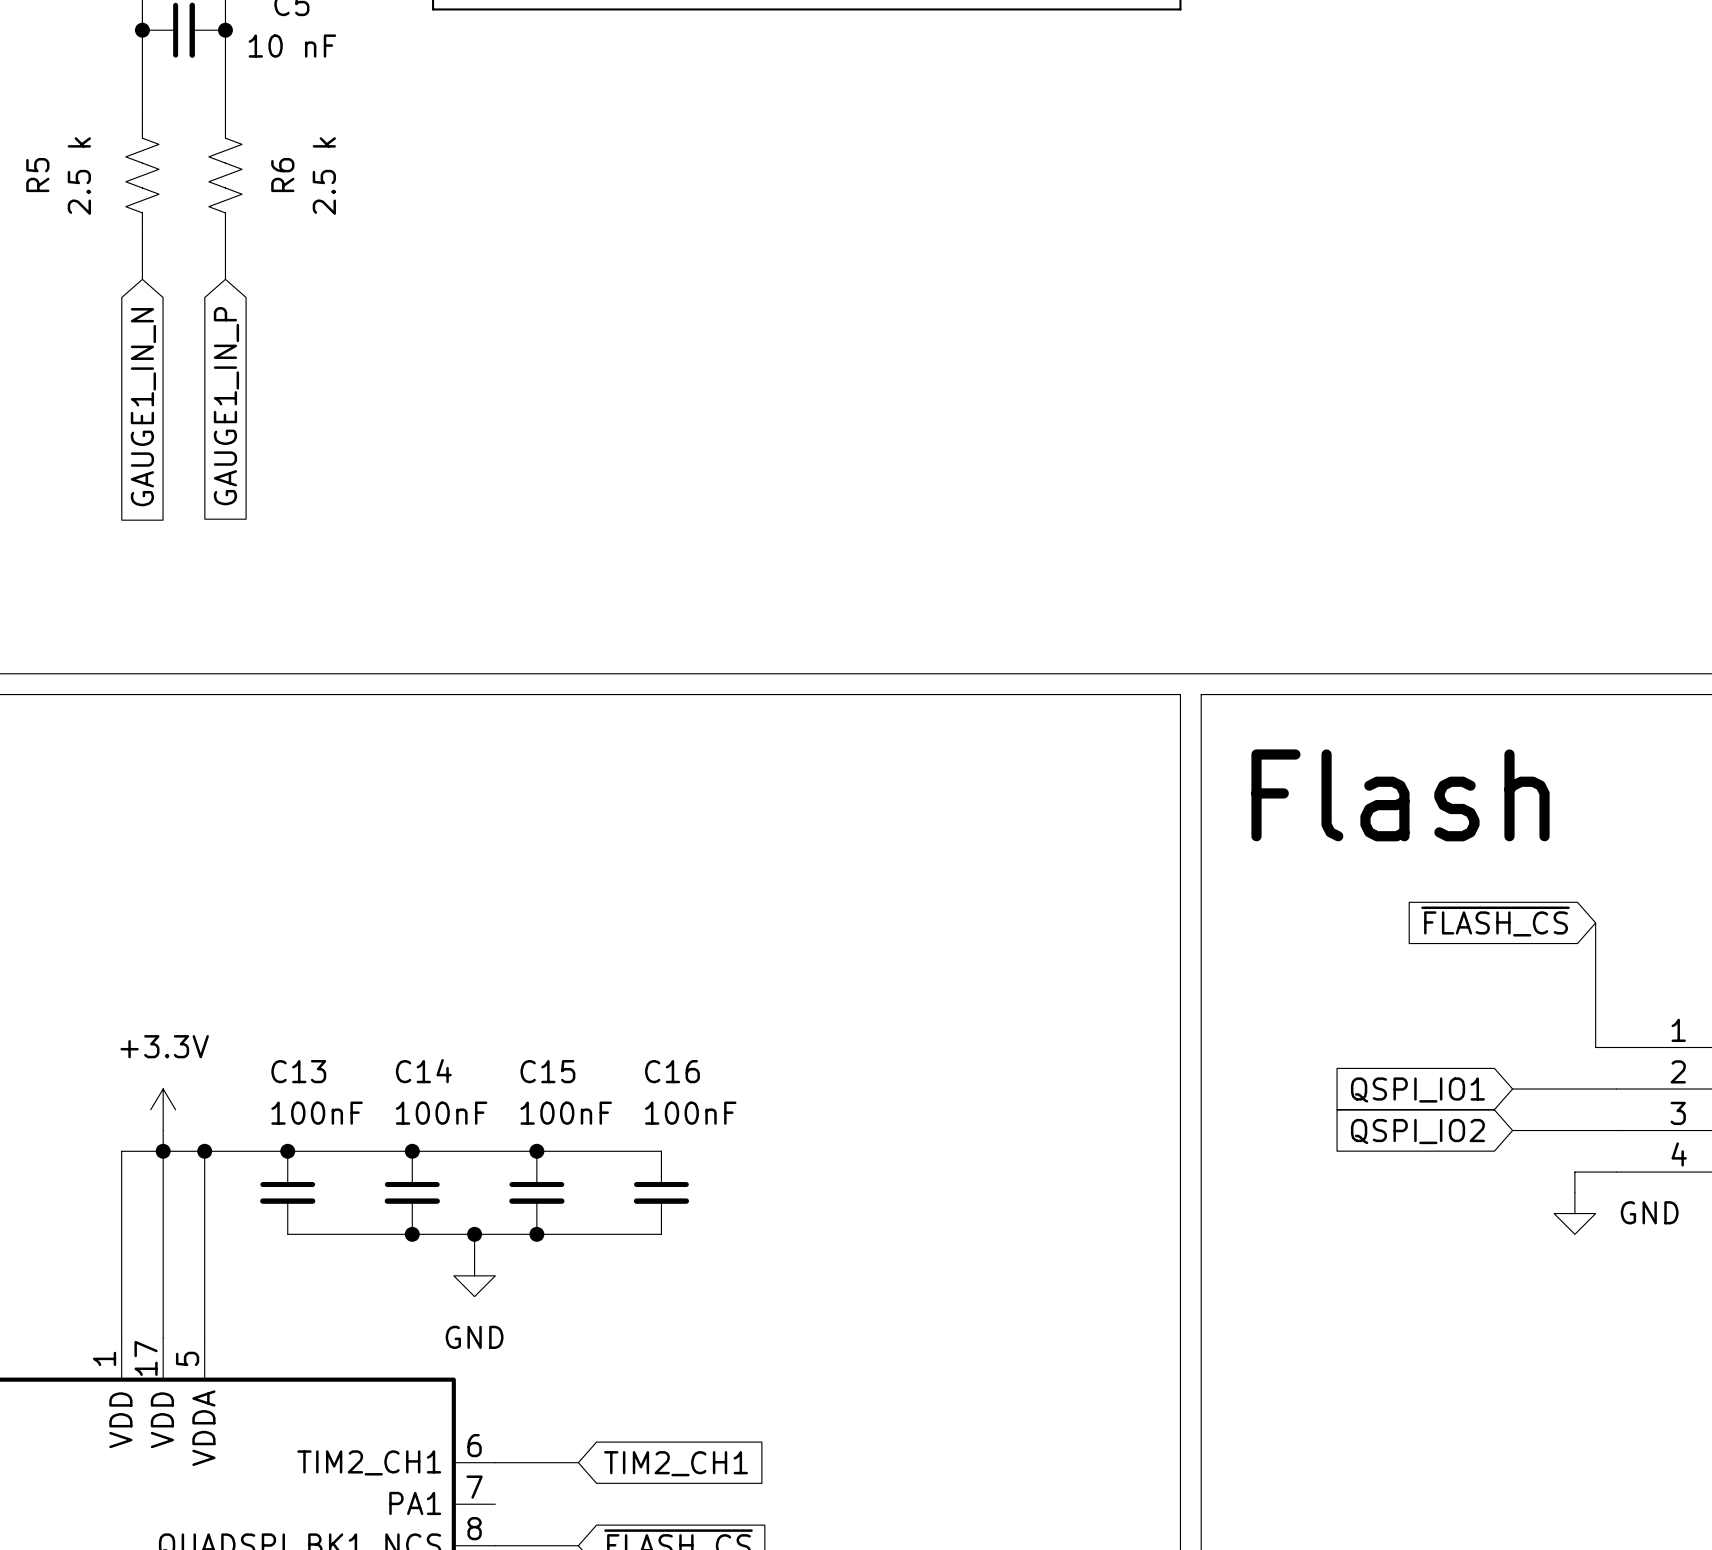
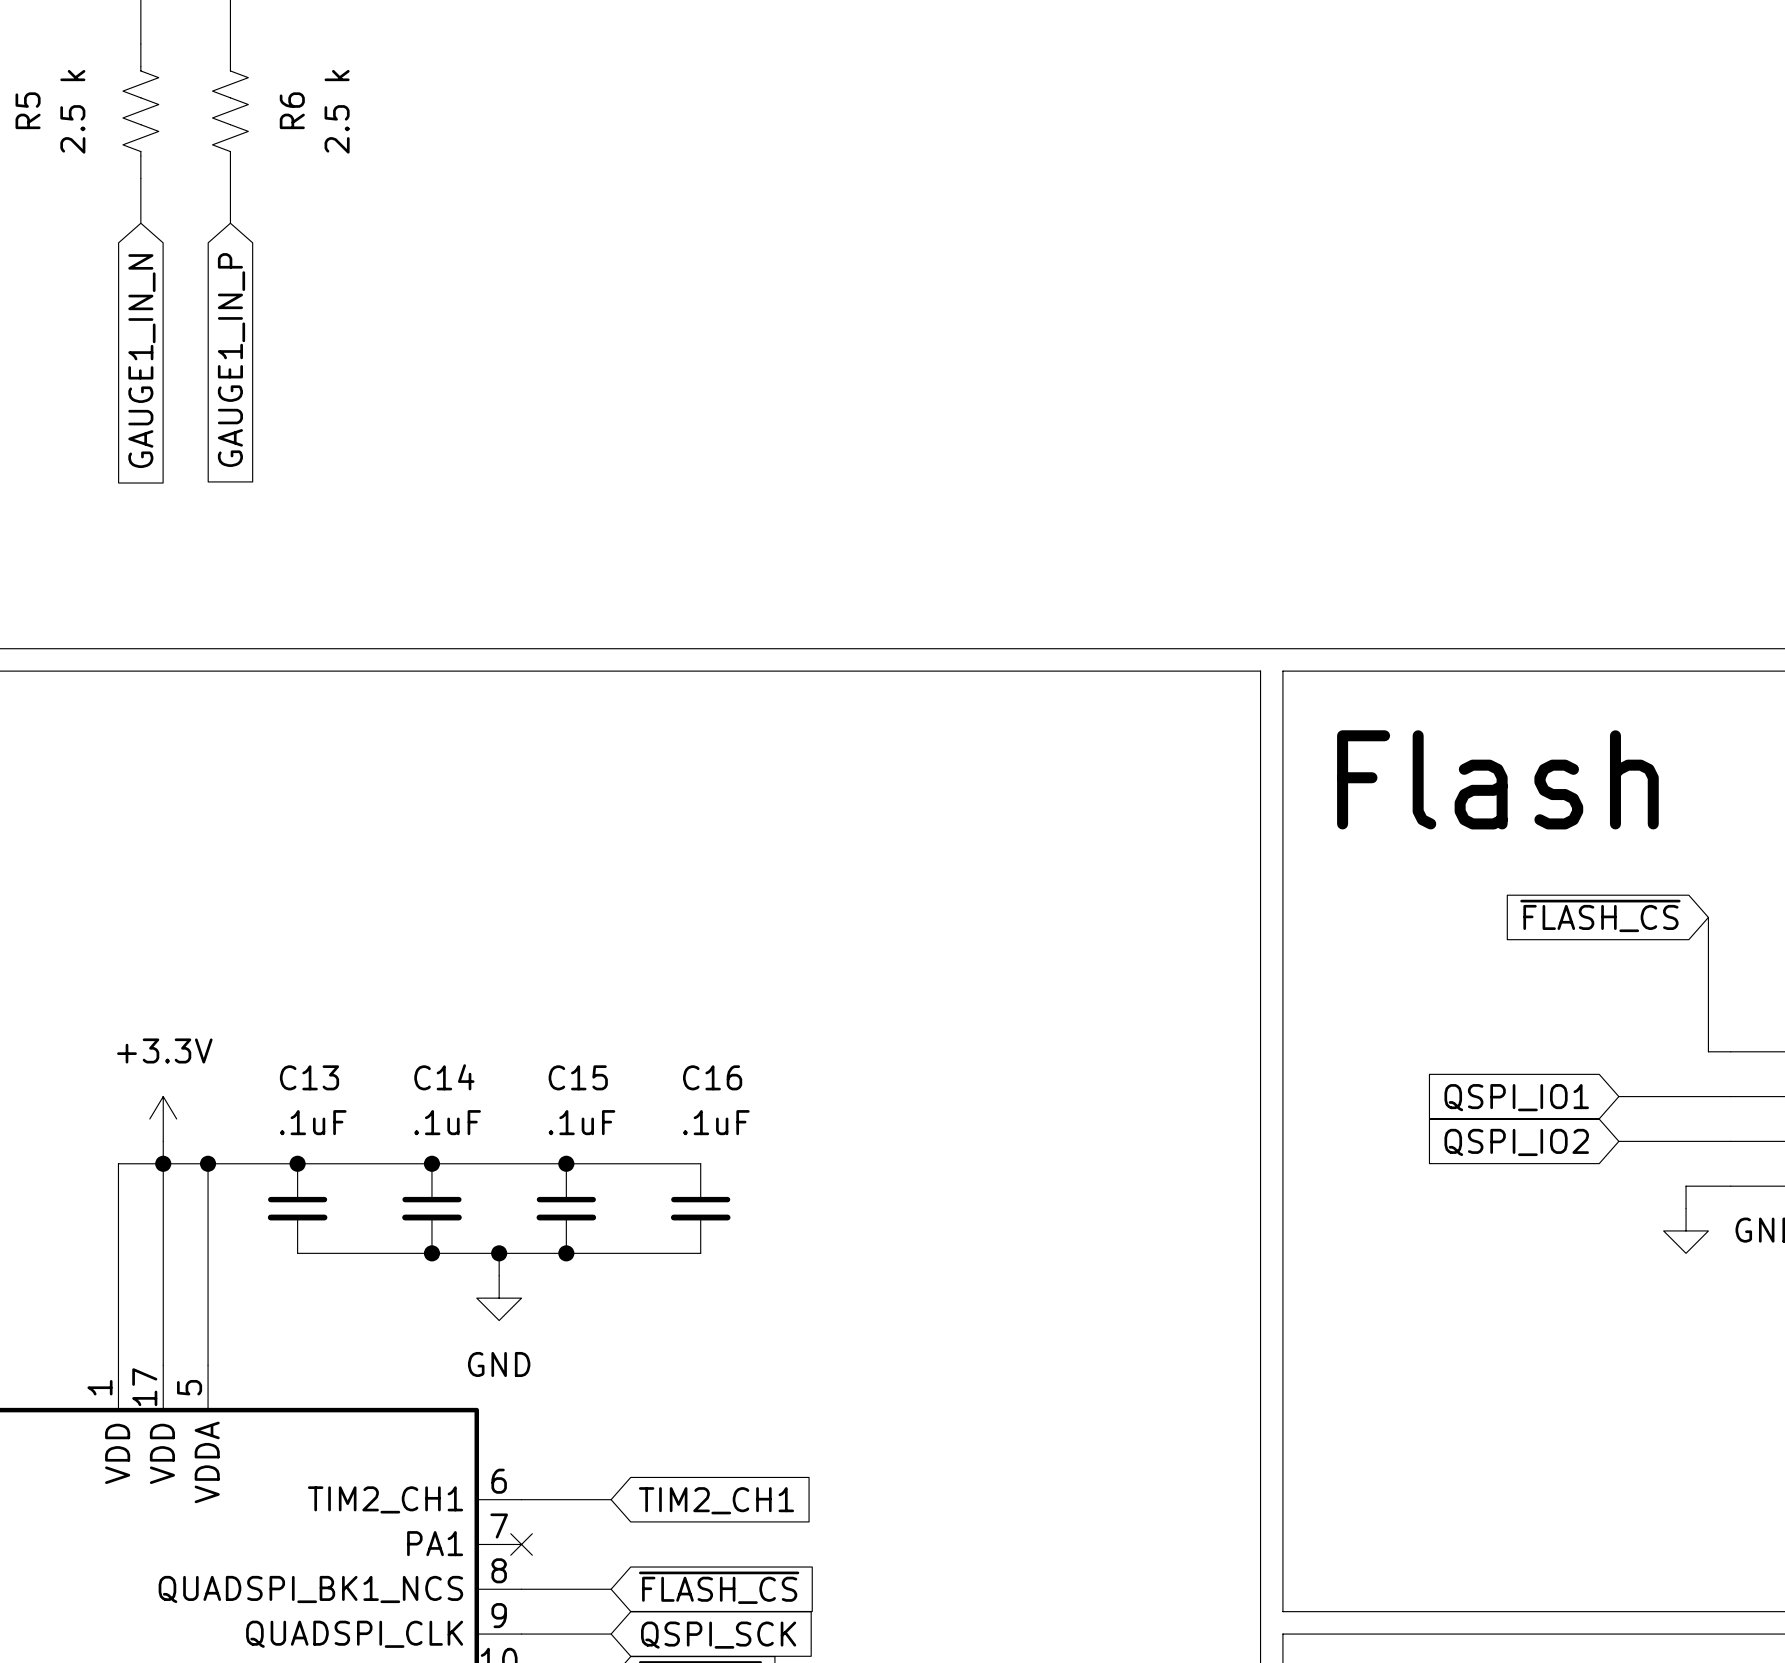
C13 value: 100nF (317, 1113) -> .1uF (313, 1122)
C14 value: 100nF (441, 1113) -> .1uF (447, 1122)
C15 value: 100nF (566, 1113) -> .1uF (581, 1122)
C16 value: 100nF (690, 1113) -> .1uF (716, 1122)
no-connect mark: none -> (521, 1544)

